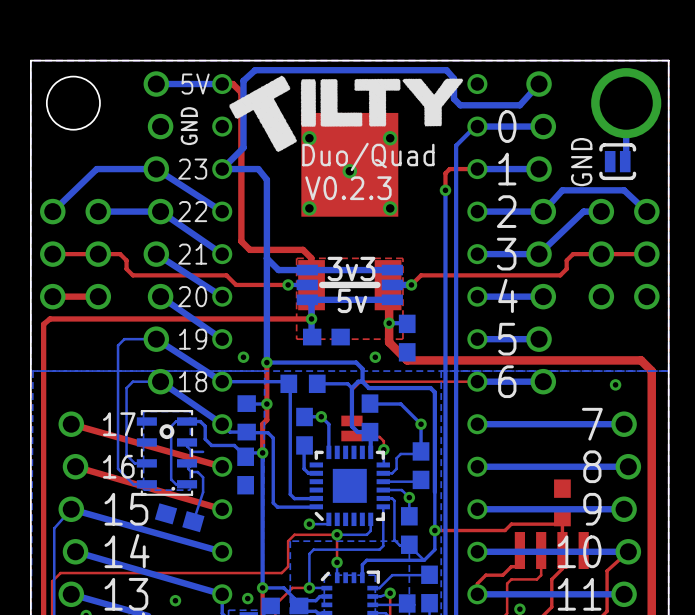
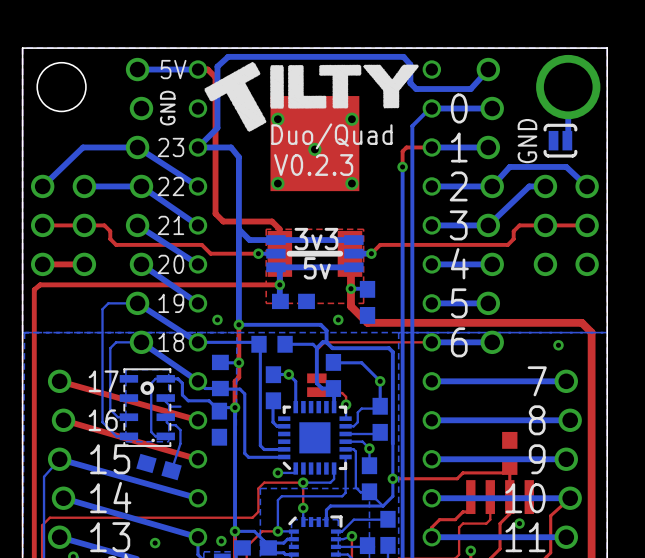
via: none -> (519, 523)

